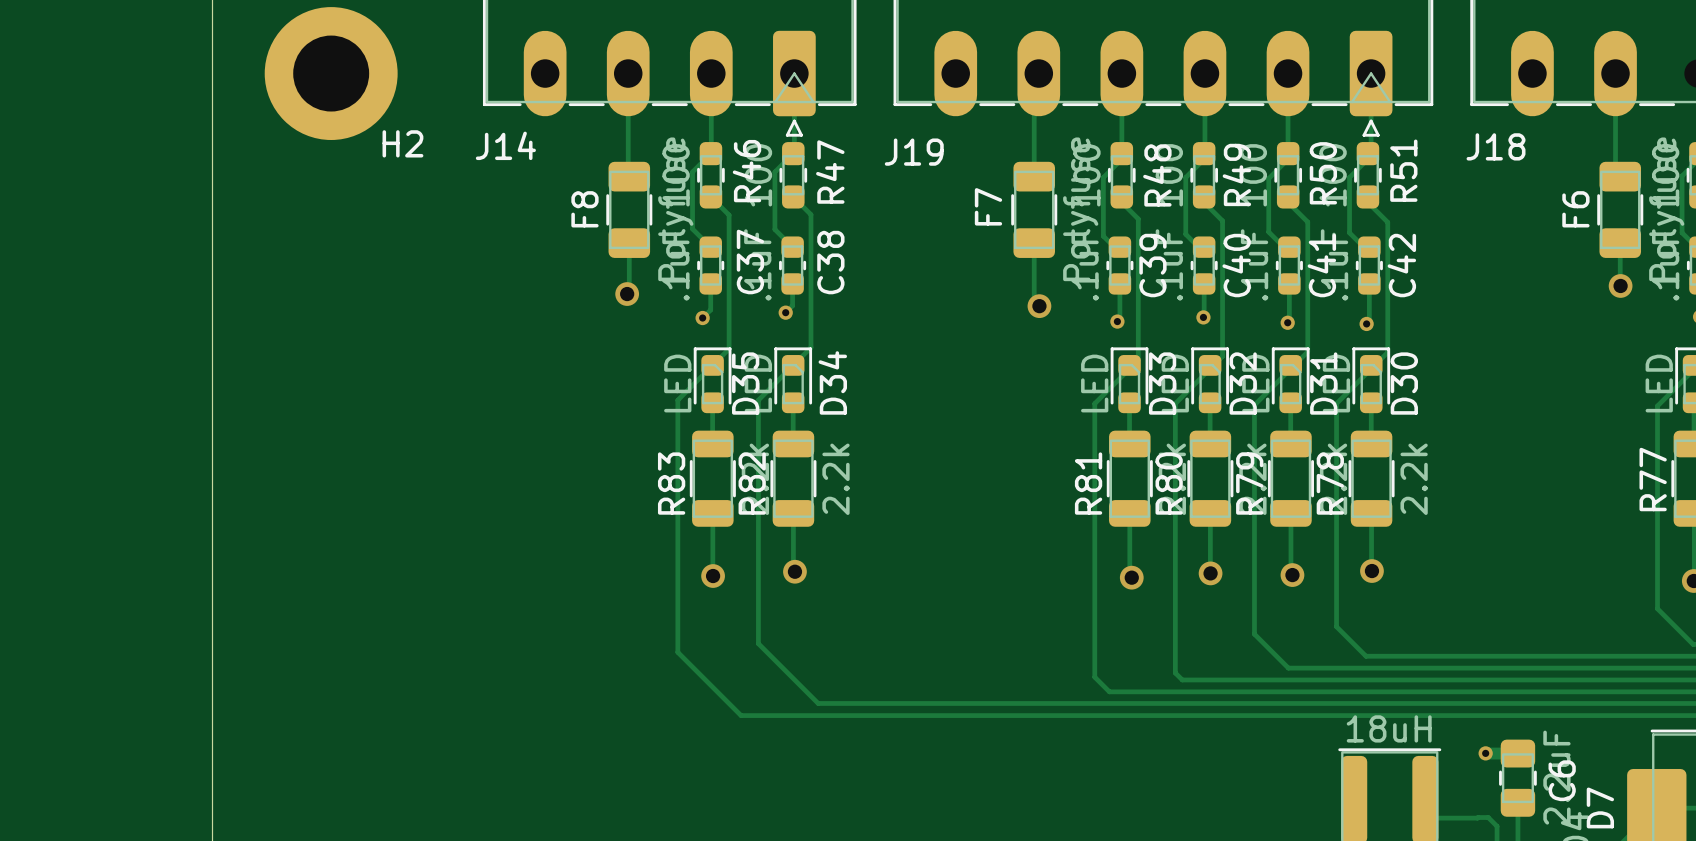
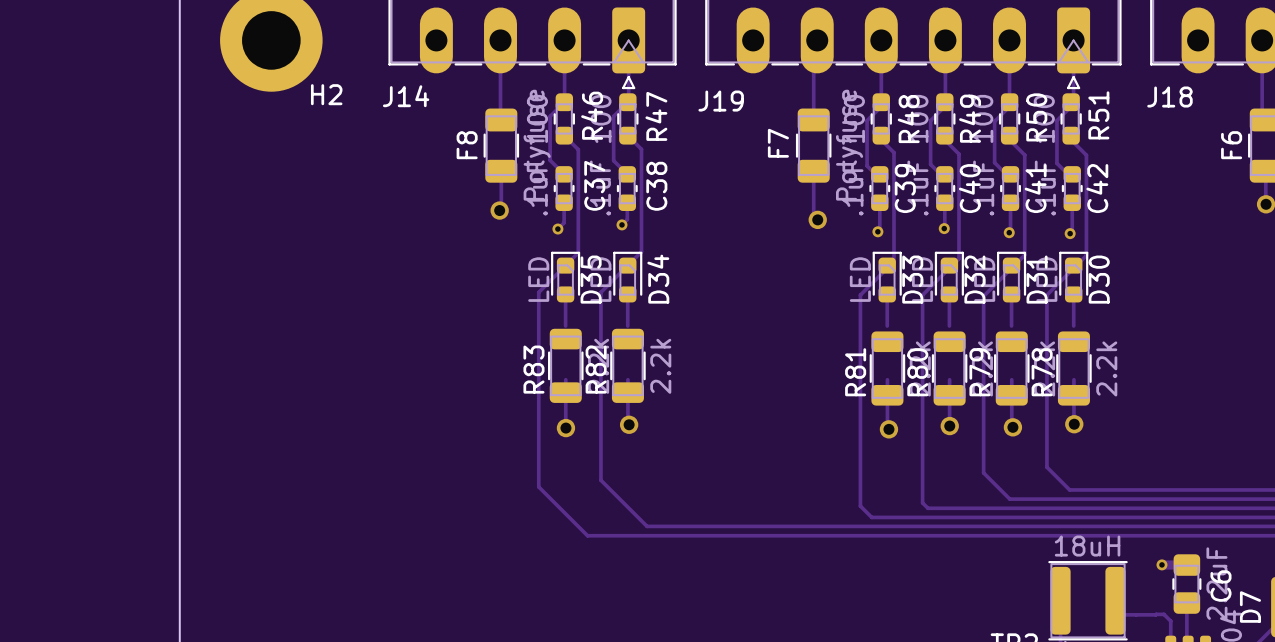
R83 position: (712, 478) -> (565, 365)
R82 position: (793, 478) -> (627, 365)
R81 position: (1129, 478) -> (887, 368)
R80 position: (1210, 478) -> (949, 368)
R79 position: (1290, 478) -> (1011, 368)
R78 position: (1371, 478) -> (1073, 368)

